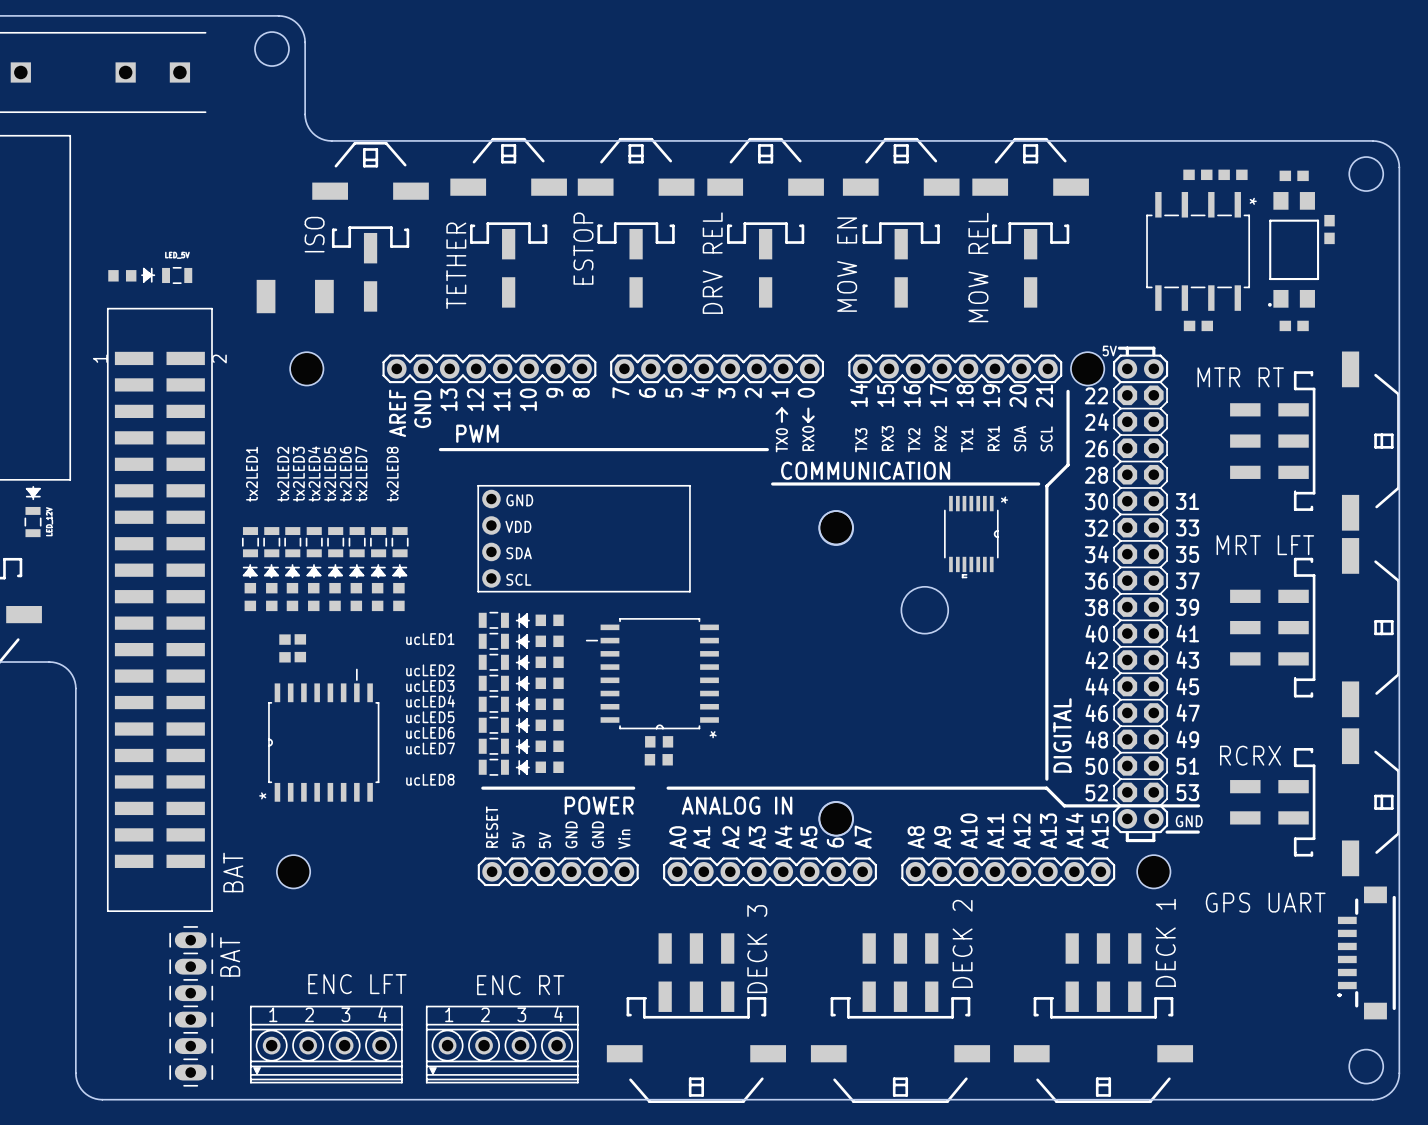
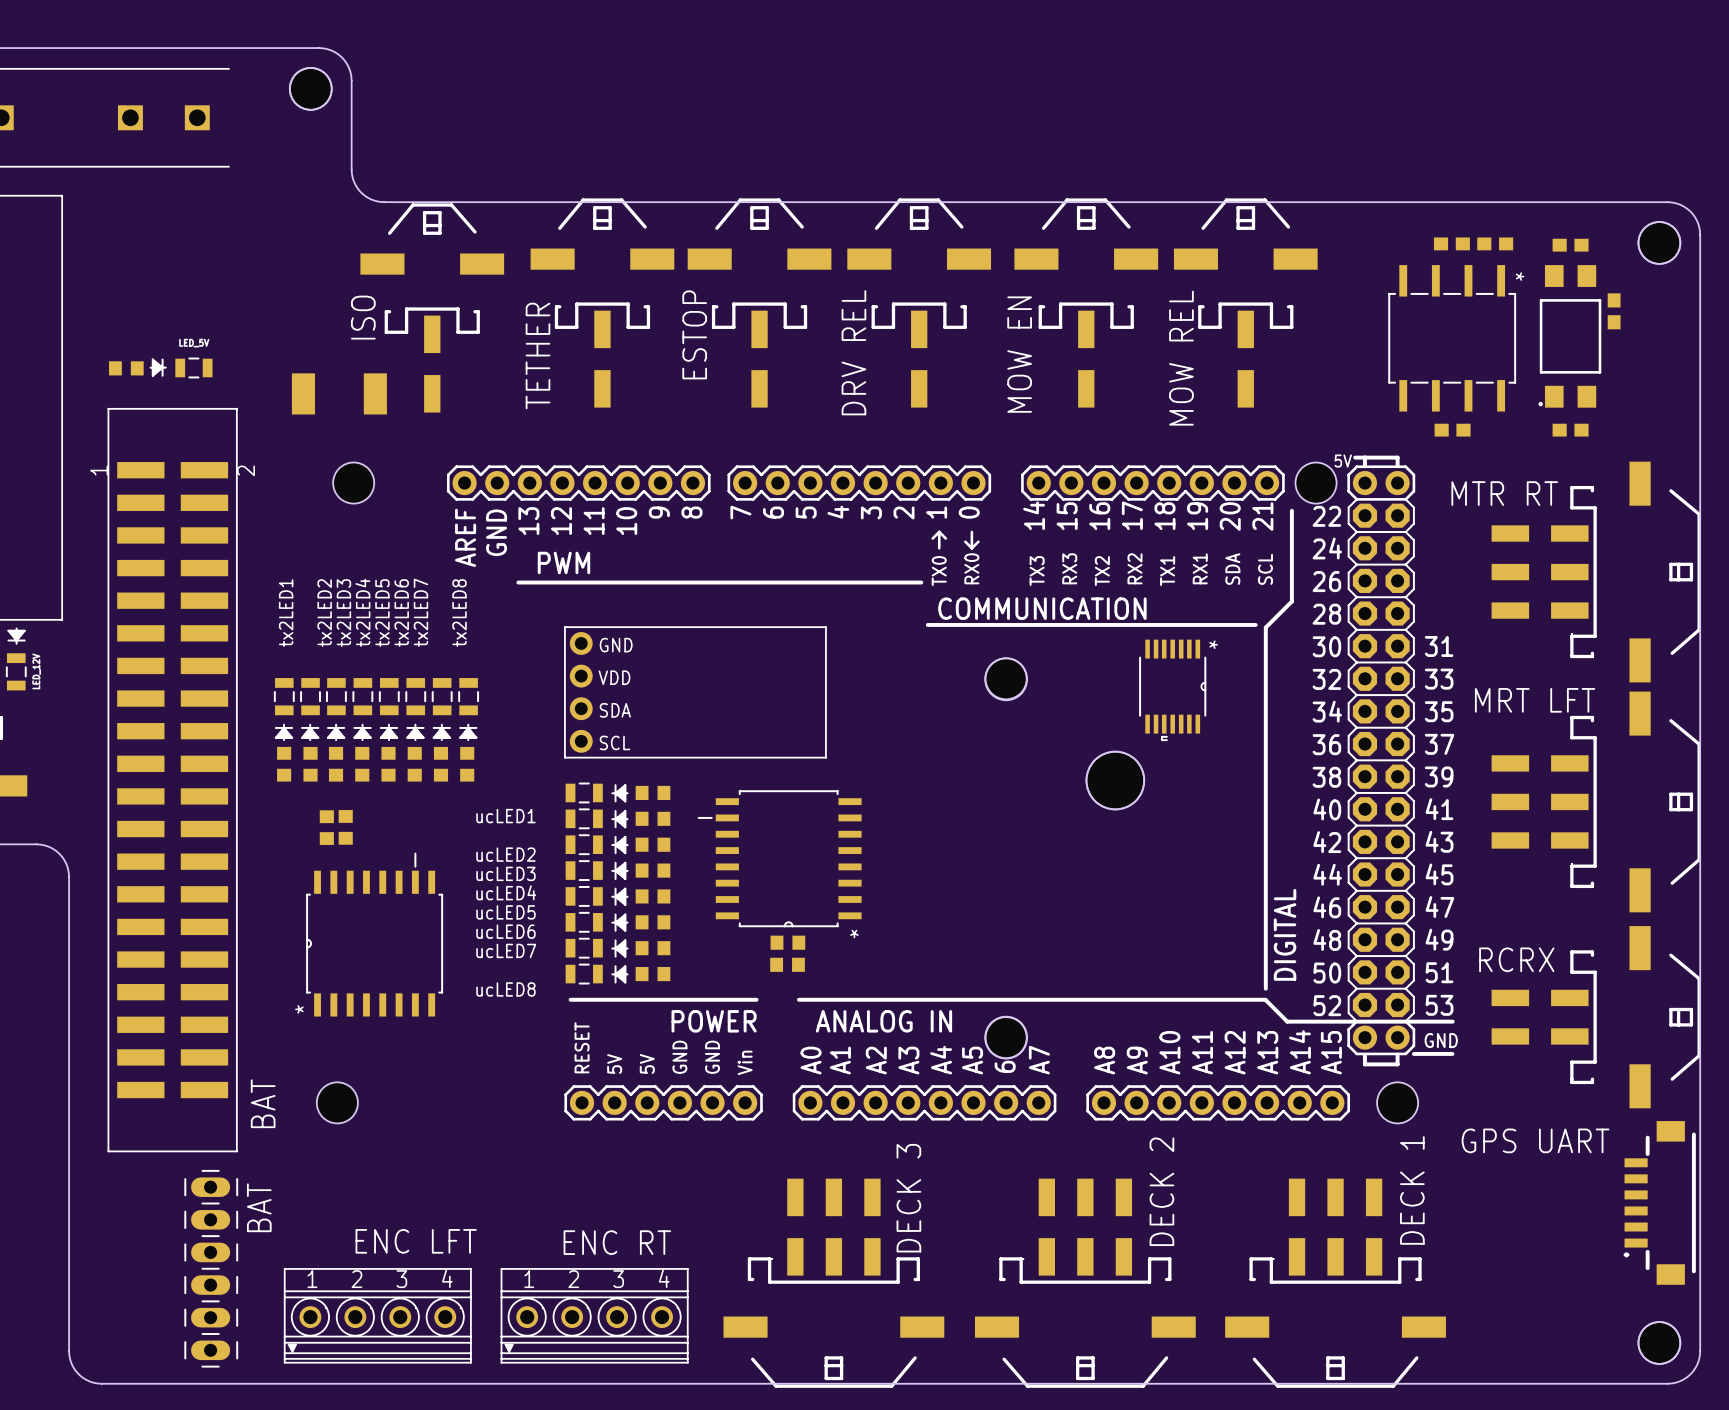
hole: none -> (310, 88)
hole: none -> (1659, 242)
hole: none -> (1115, 780)
hole: none -> (1659, 1342)

